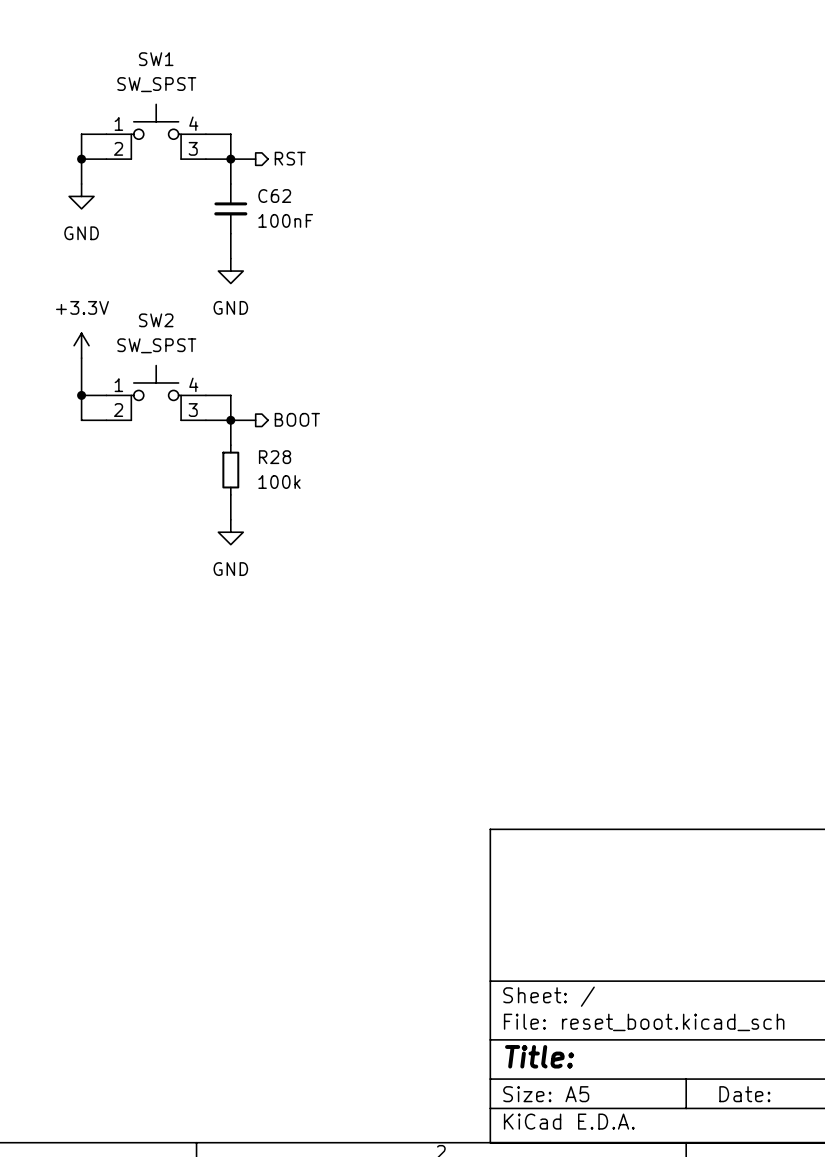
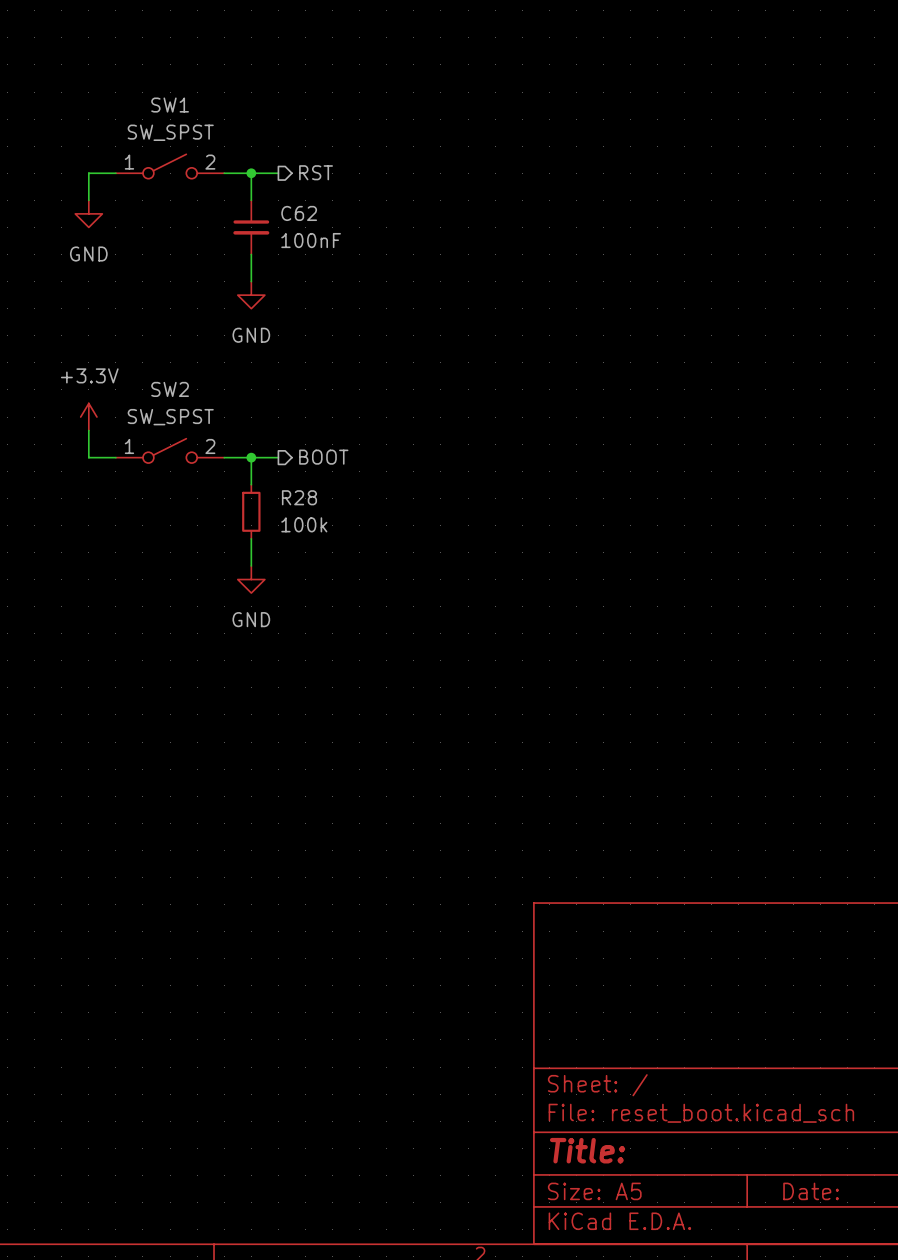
SW1 symbol: [106, 104, 206, 160] -> [115, 154, 225, 179]
wire: (106, 134) (81, 134) (81, 159) -> none
wire: (205, 134) (230, 134) (230, 159) -> none
junction: (81, 159) -> none
power symbol position: +3.3V (81, 345) -> +3.3V (88, 417)
wire: (81, 358) (81, 395) (106, 395) -> none
SW2 symbol: [106, 365, 206, 421] -> [115, 438, 225, 464]
junction: (81, 395) -> none
wire: (205, 395) (230, 395) (230, 420) -> none

